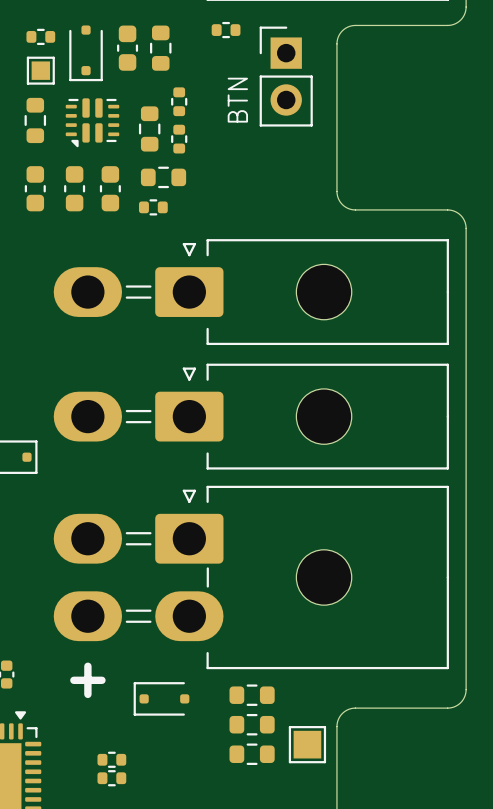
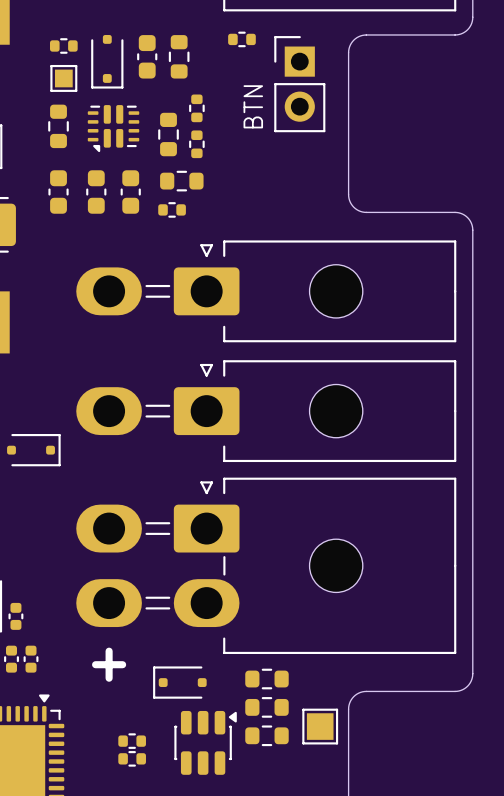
part: none -> (205, 742)

